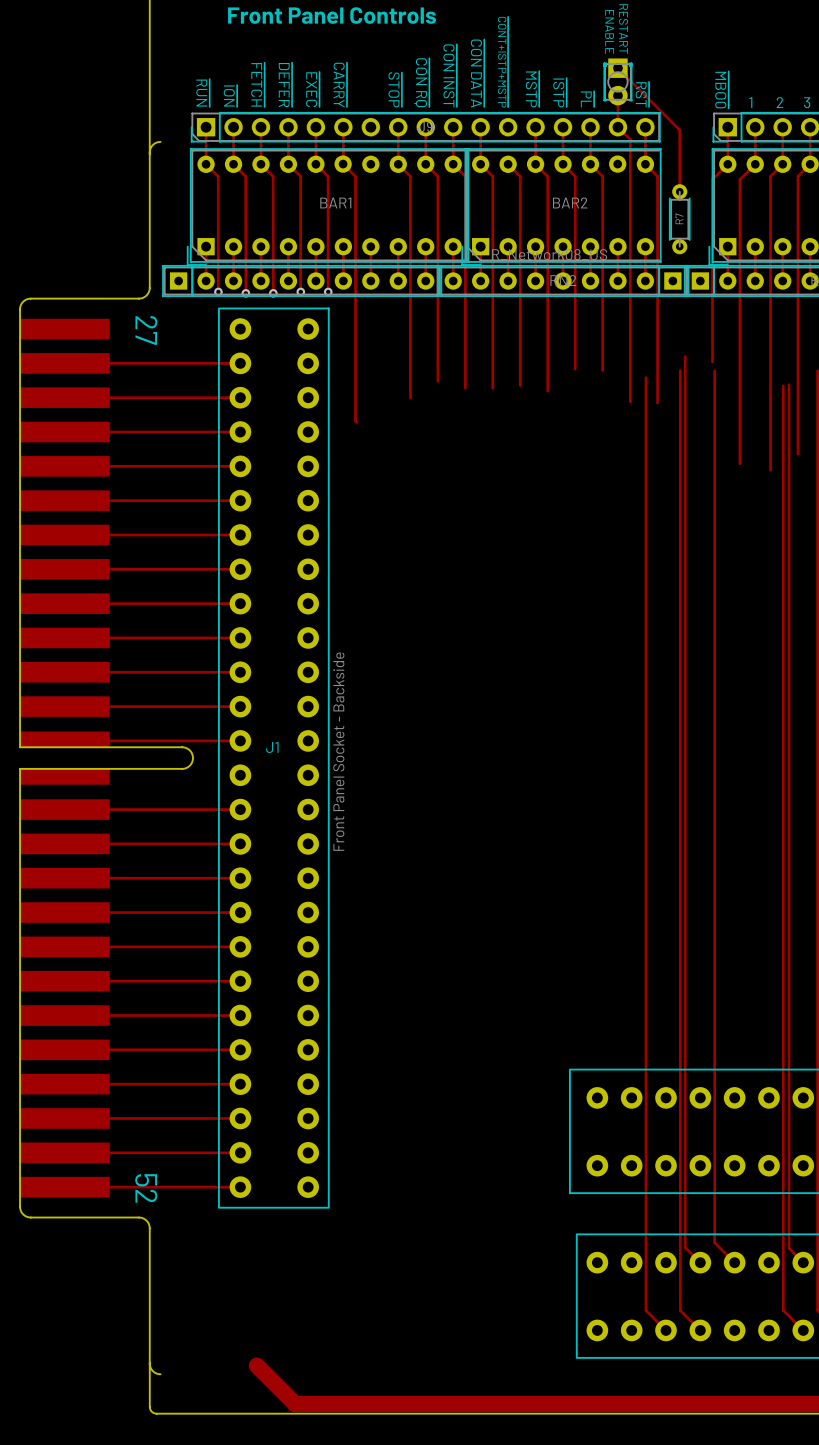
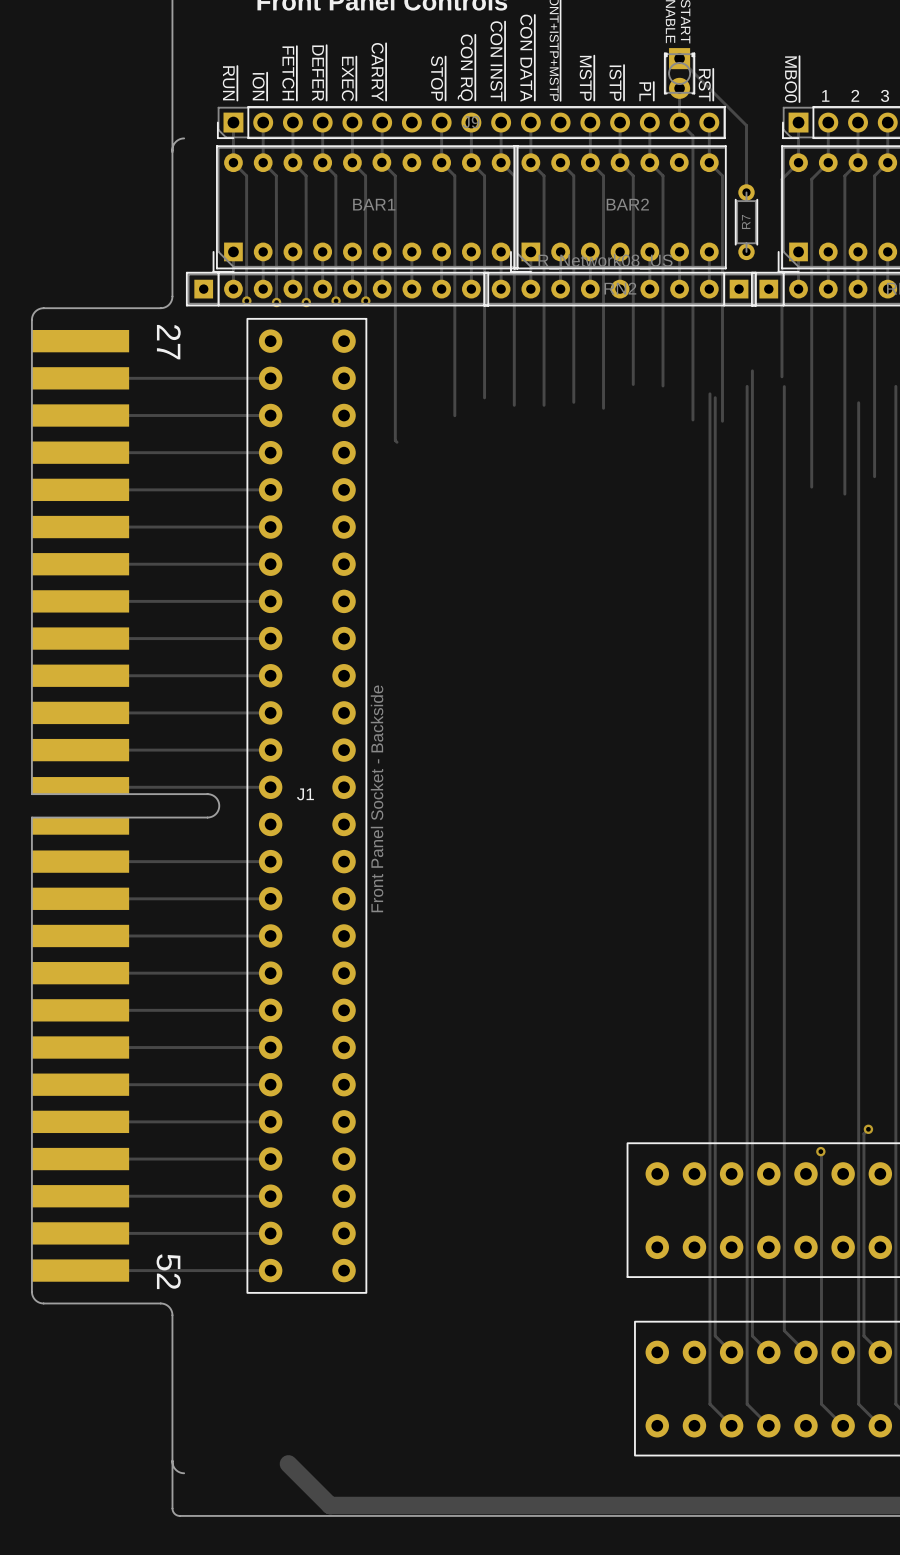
track: none -> (715, 397) (715, 1335) (731, 1352)
track: (788, 384) (788, 1248) -> (868, 1129) (863, 1133) (864, 1336)
via: none -> (868, 1129)
track: none -> (821, 1150) (821, 1404) (843, 1425)
via: none -> (820, 1151)

